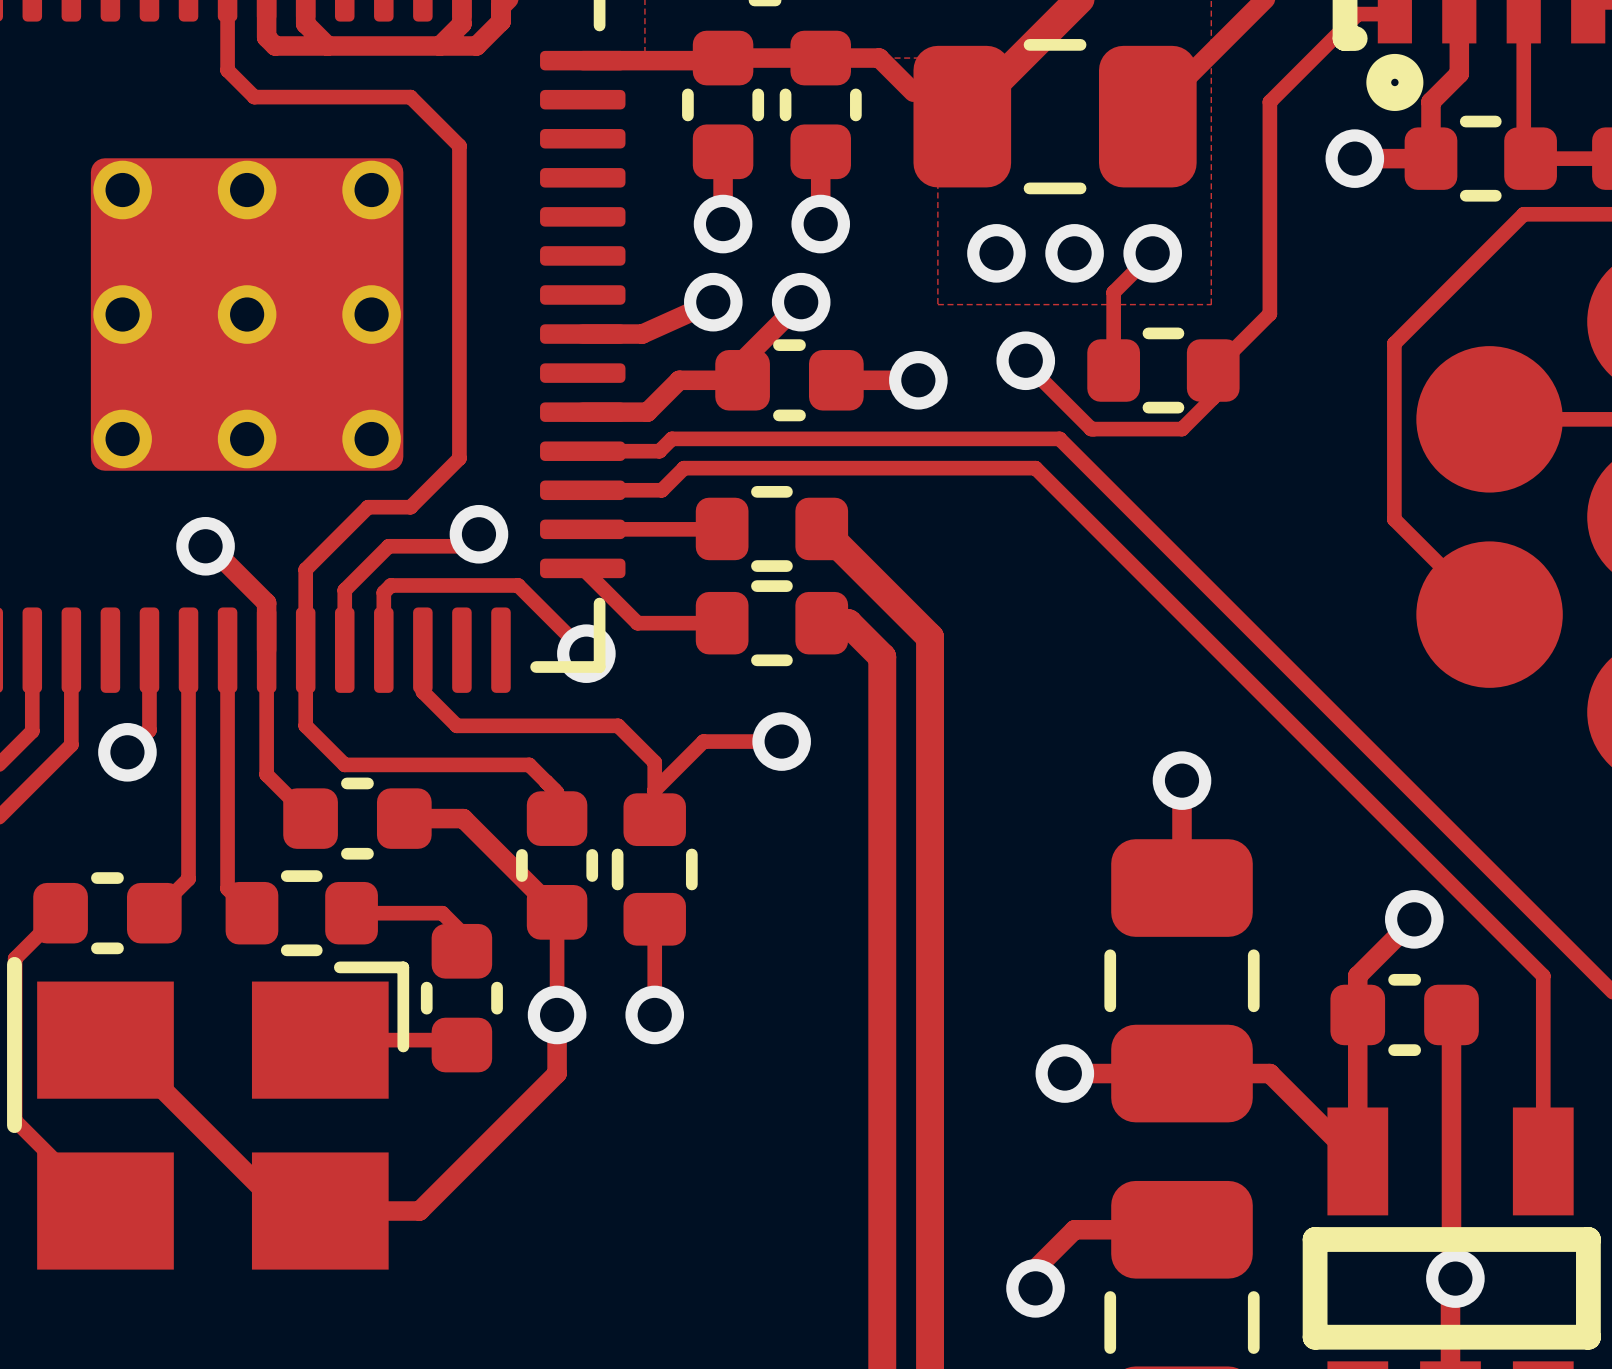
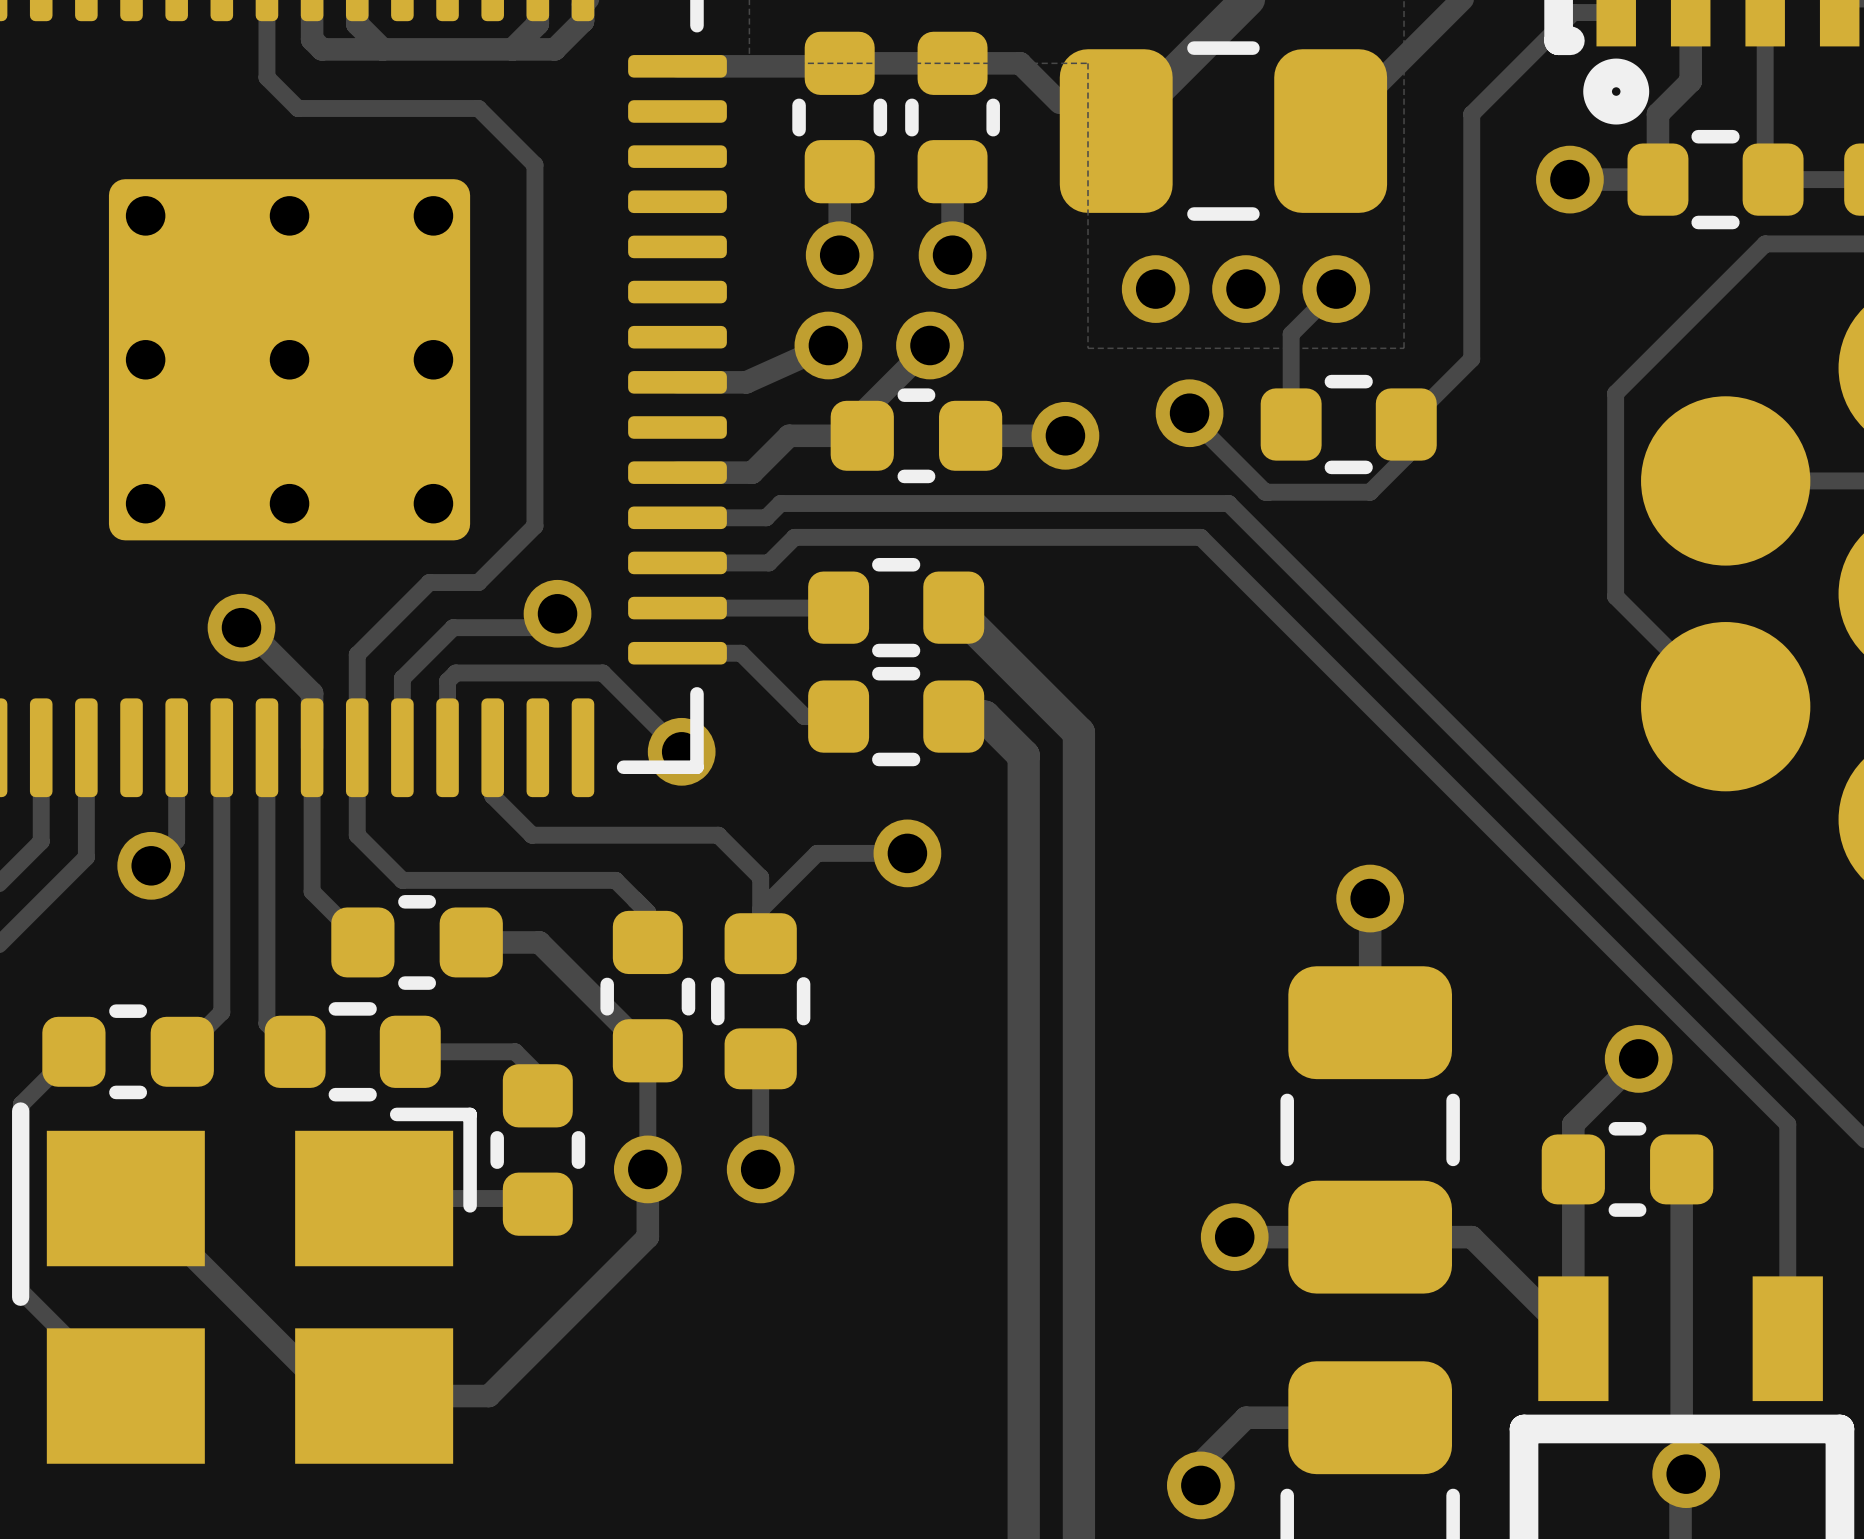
track: (582, 568) (637, 623) (692, 623) -> (677, 653) (741, 653) (804, 716)

